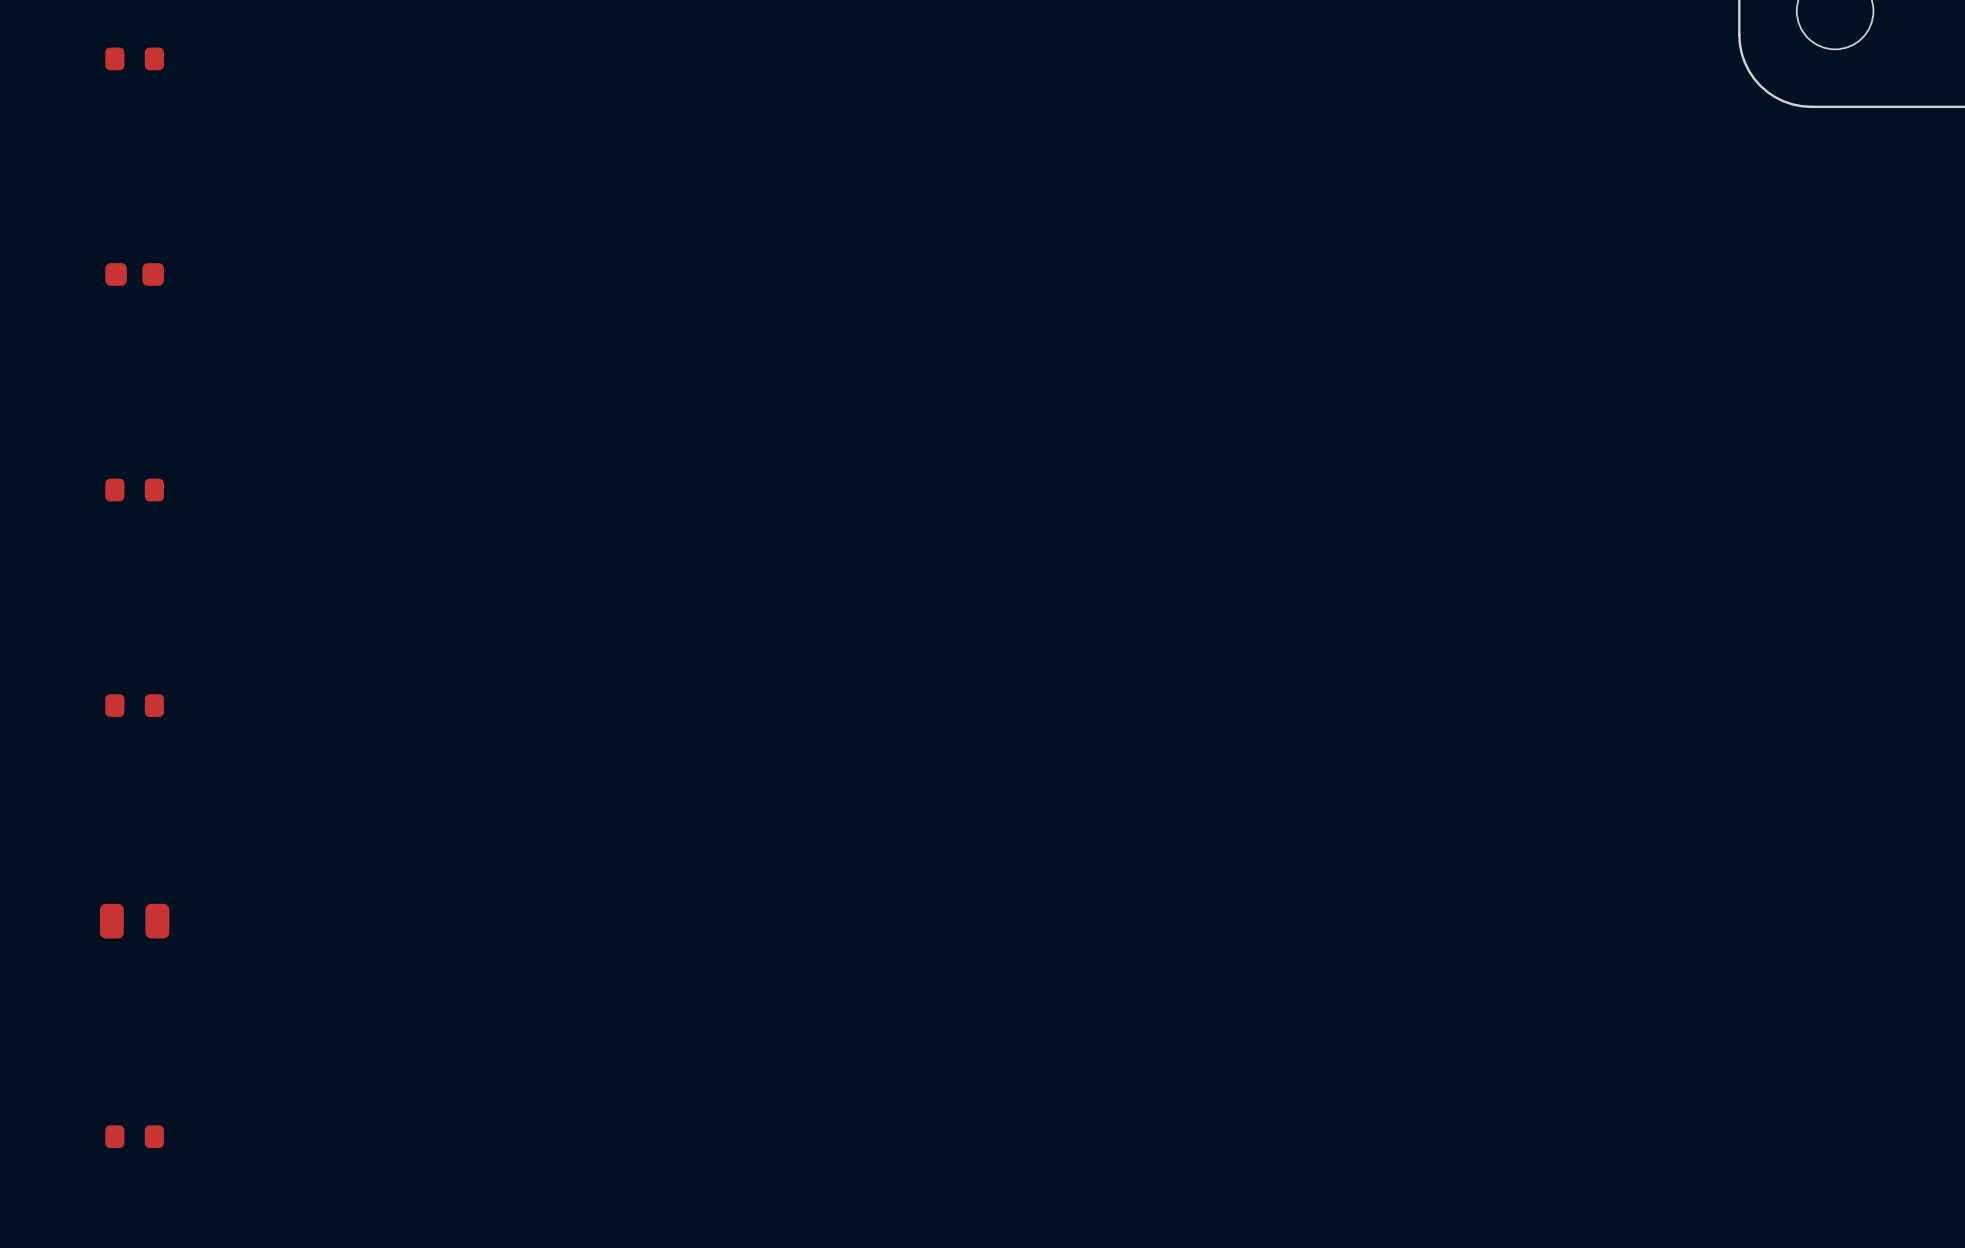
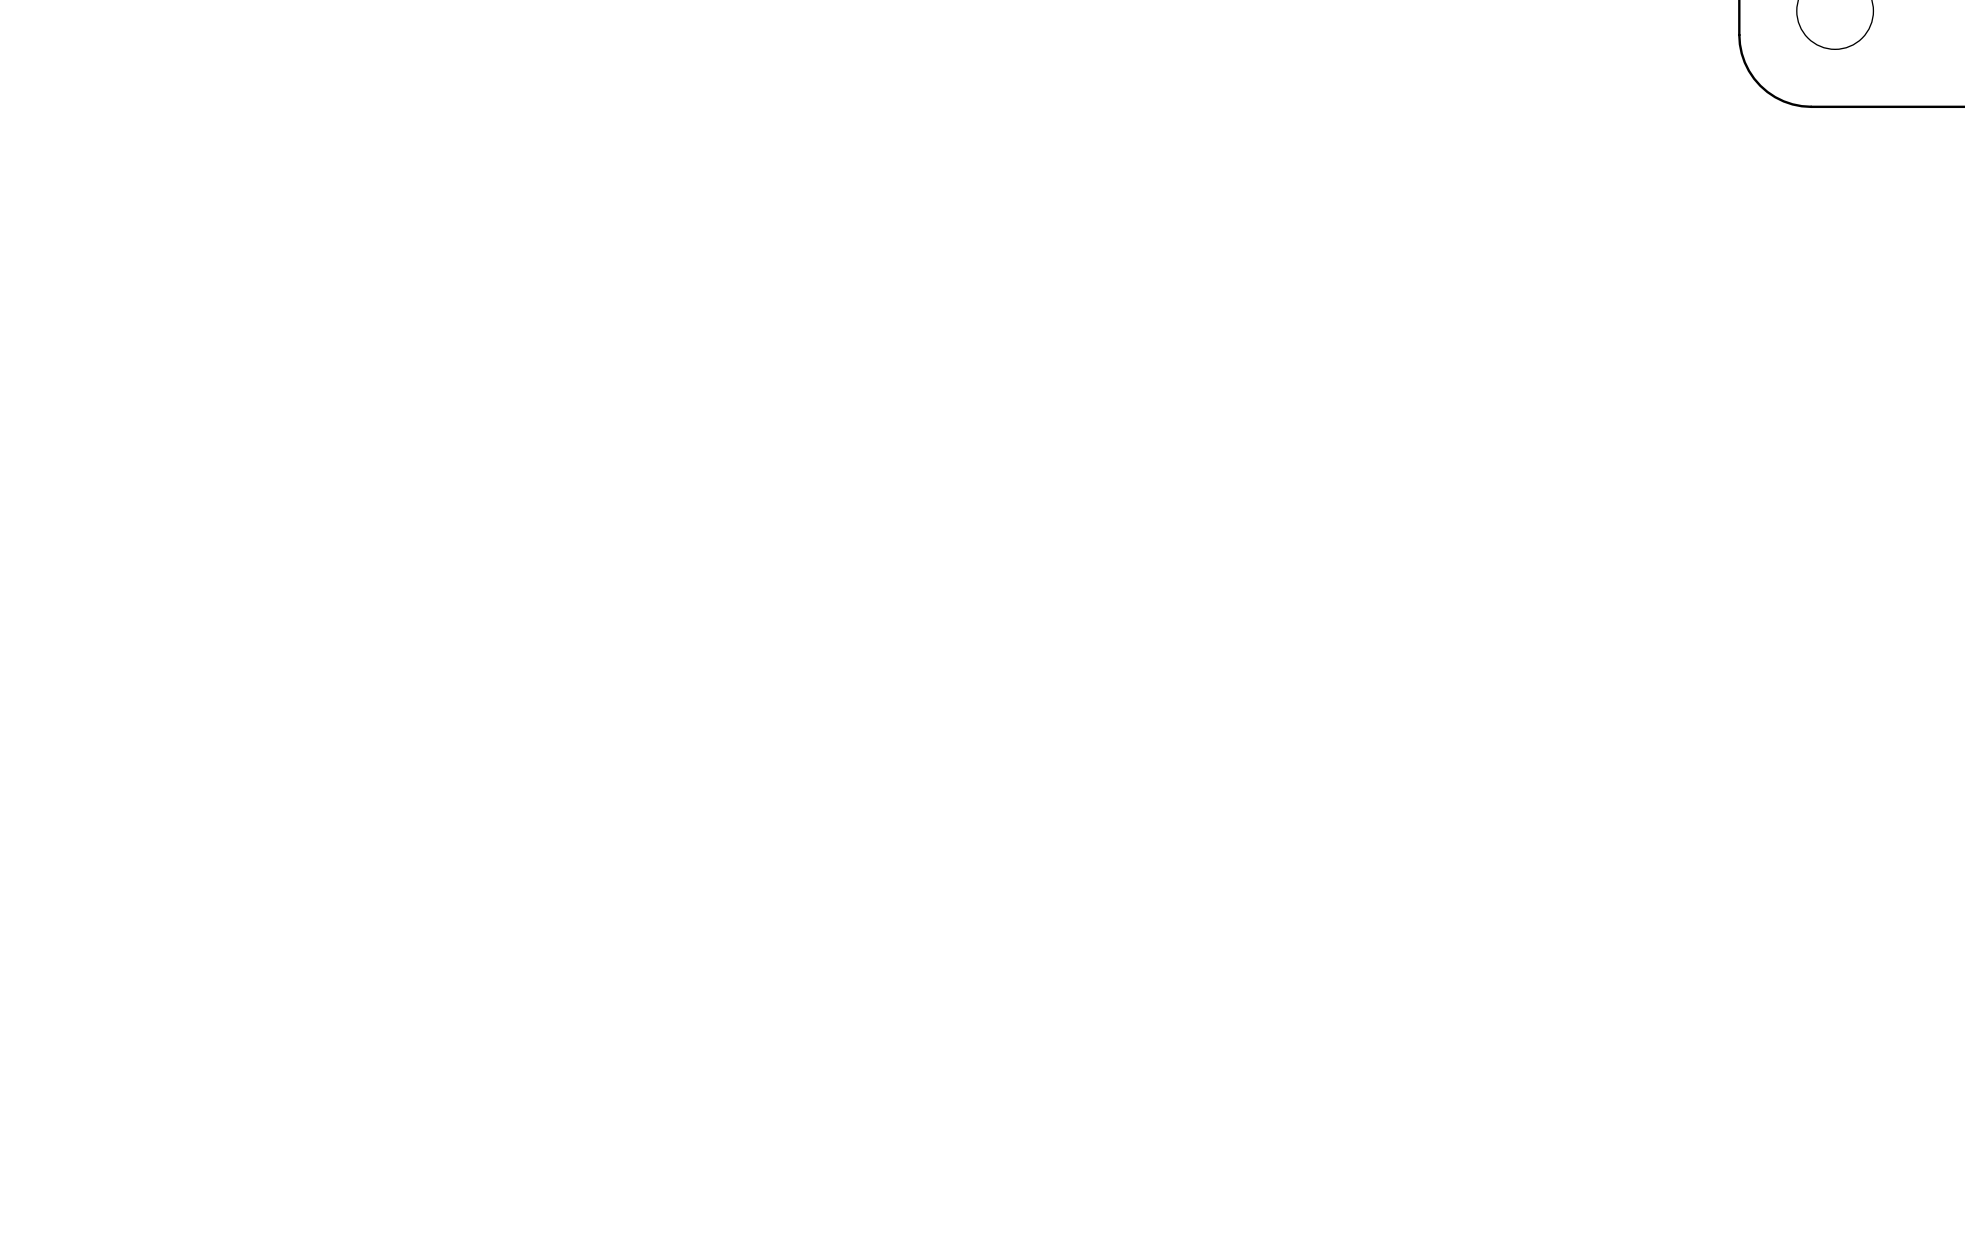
part: (134, 58) -> none
part: (134, 274) -> none
part: (134, 490) -> none
part: (134, 705) -> none
part: (134, 921) -> none
part: (134, 1136) -> none

